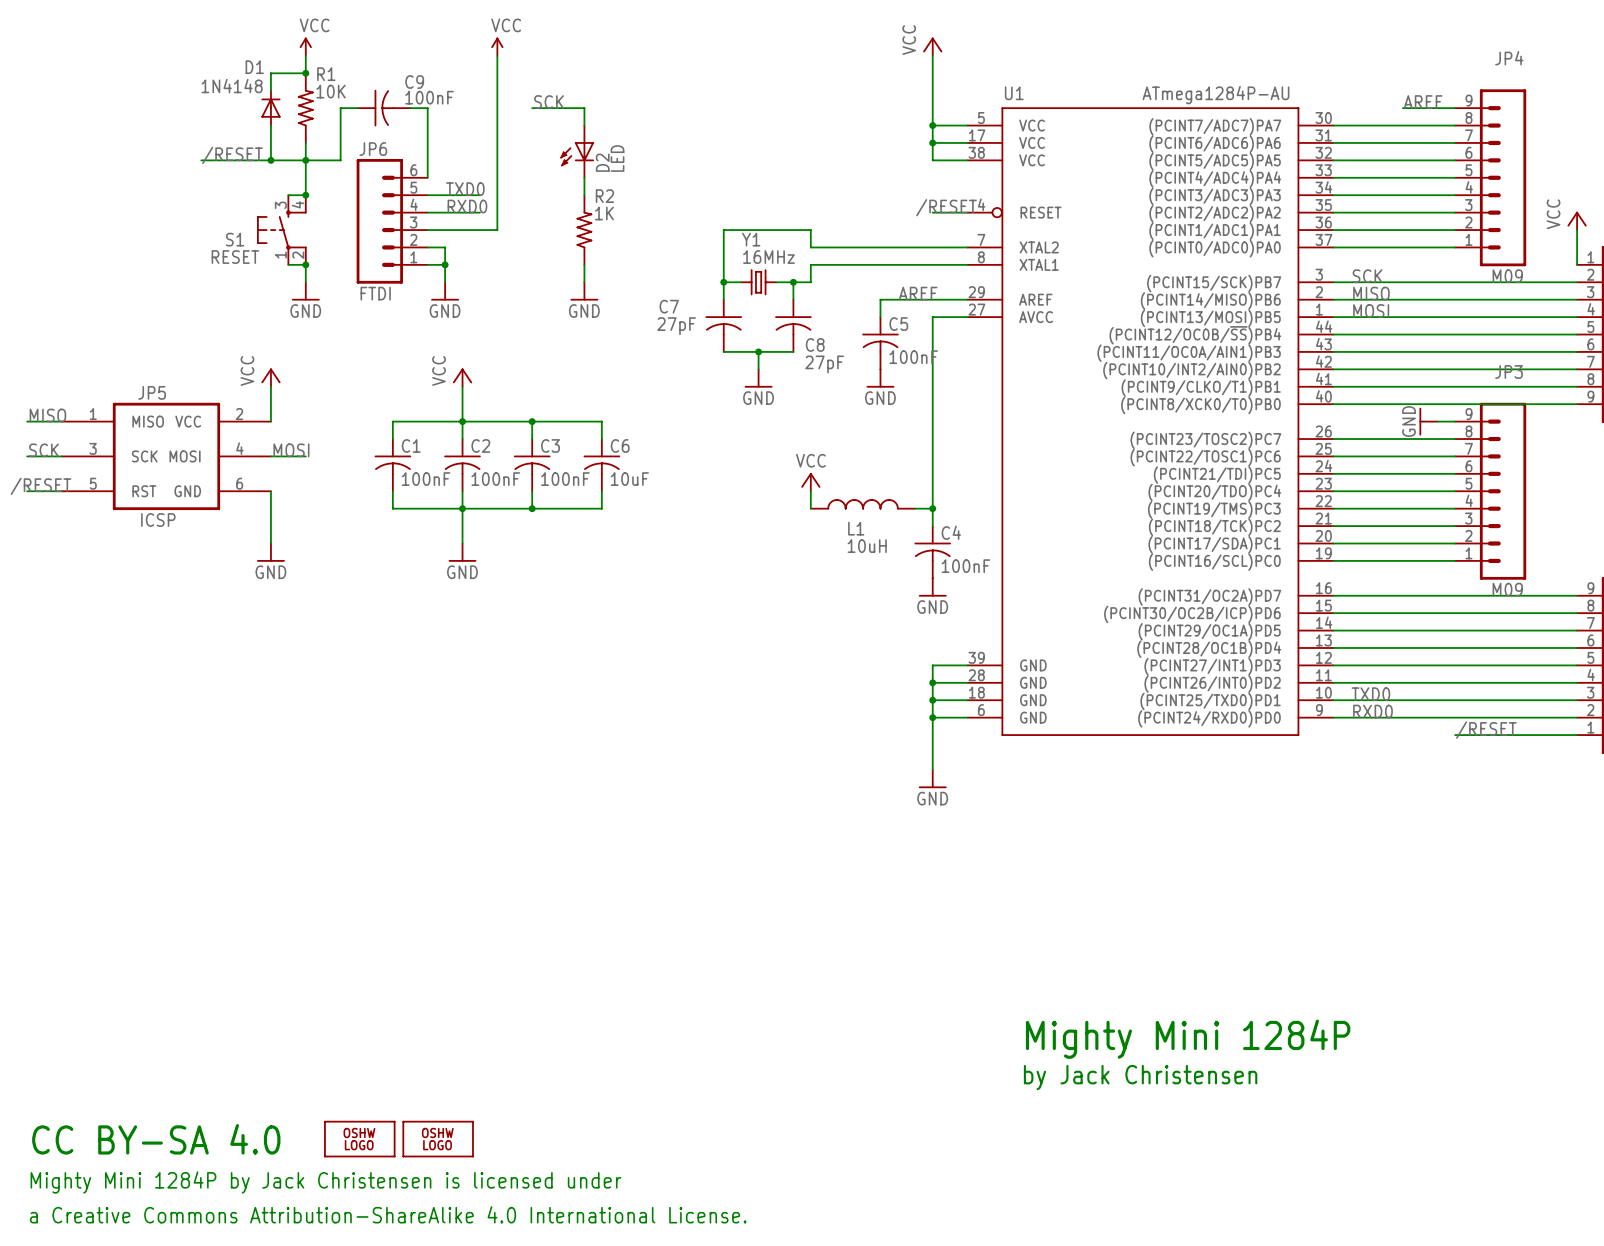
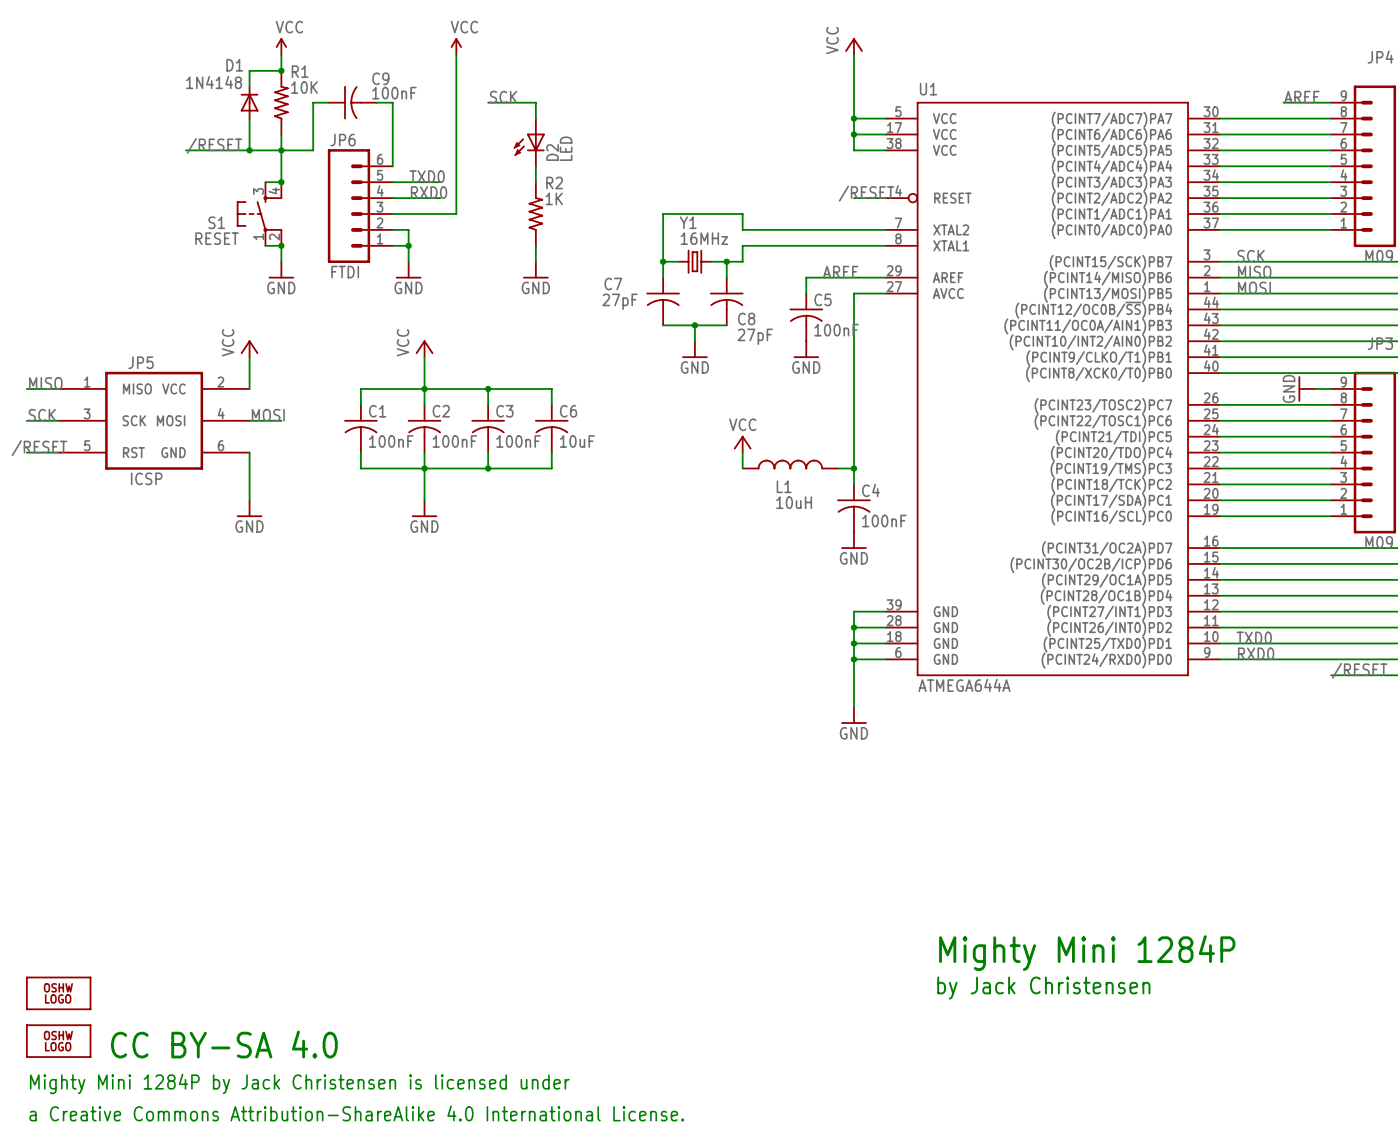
U1 value: ATmega1284P-AU (1216, 95) -> ATMEGA644A (964, 685)
part: none -> (58, 993)
part: none -> (58, 1041)
text position: CC BY-SA 4.0 (156, 1139) -> CC BY-SA 4.0 (224, 1044)
part: (359, 1139) -> none
part: (438, 1139) -> none

